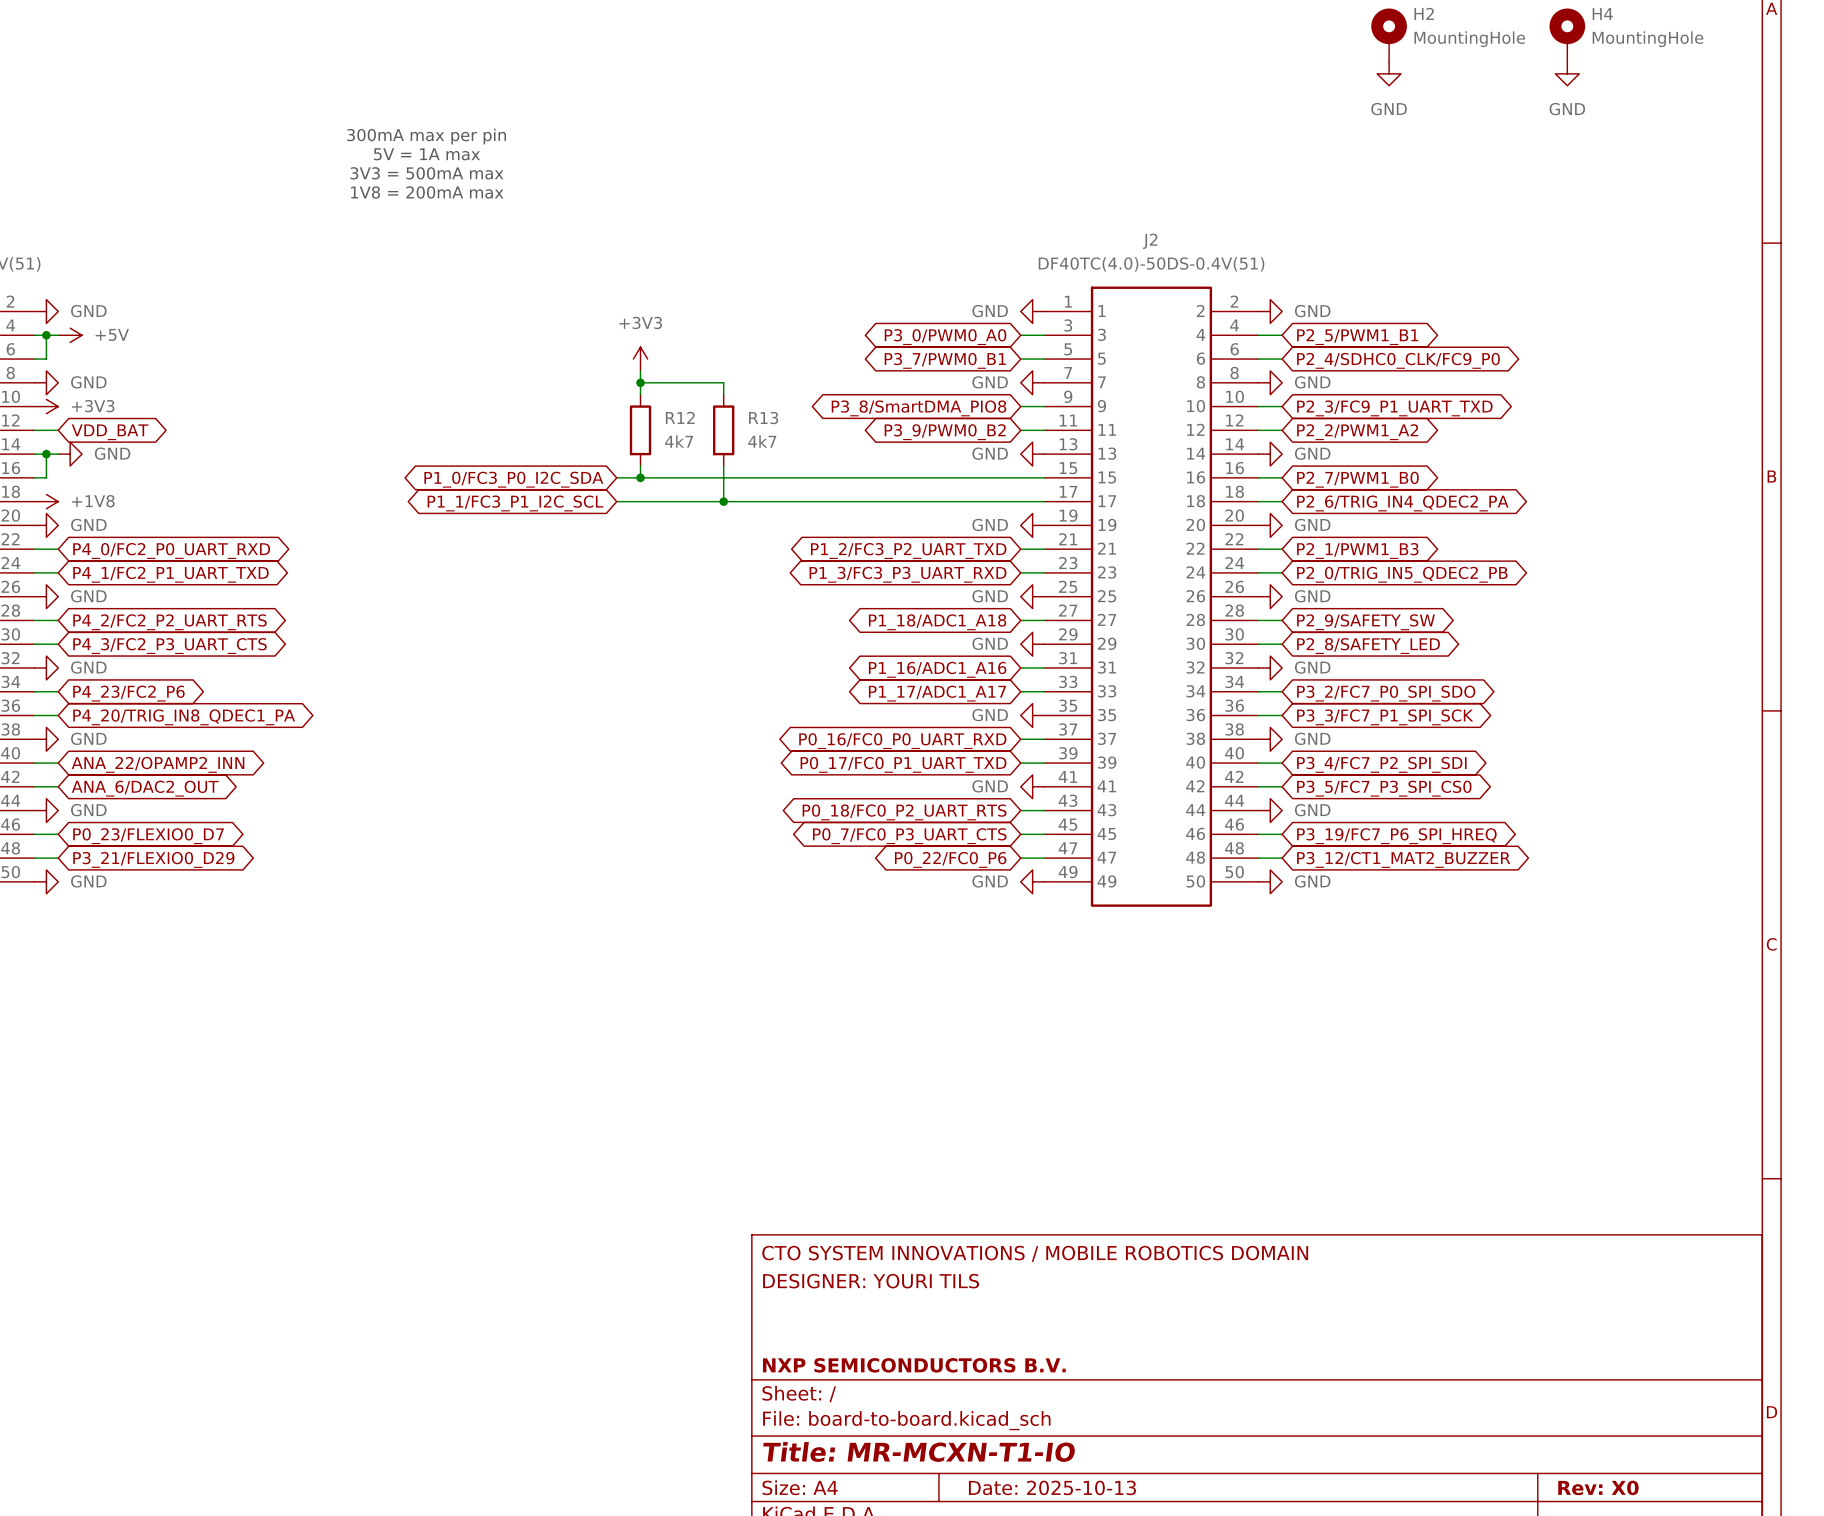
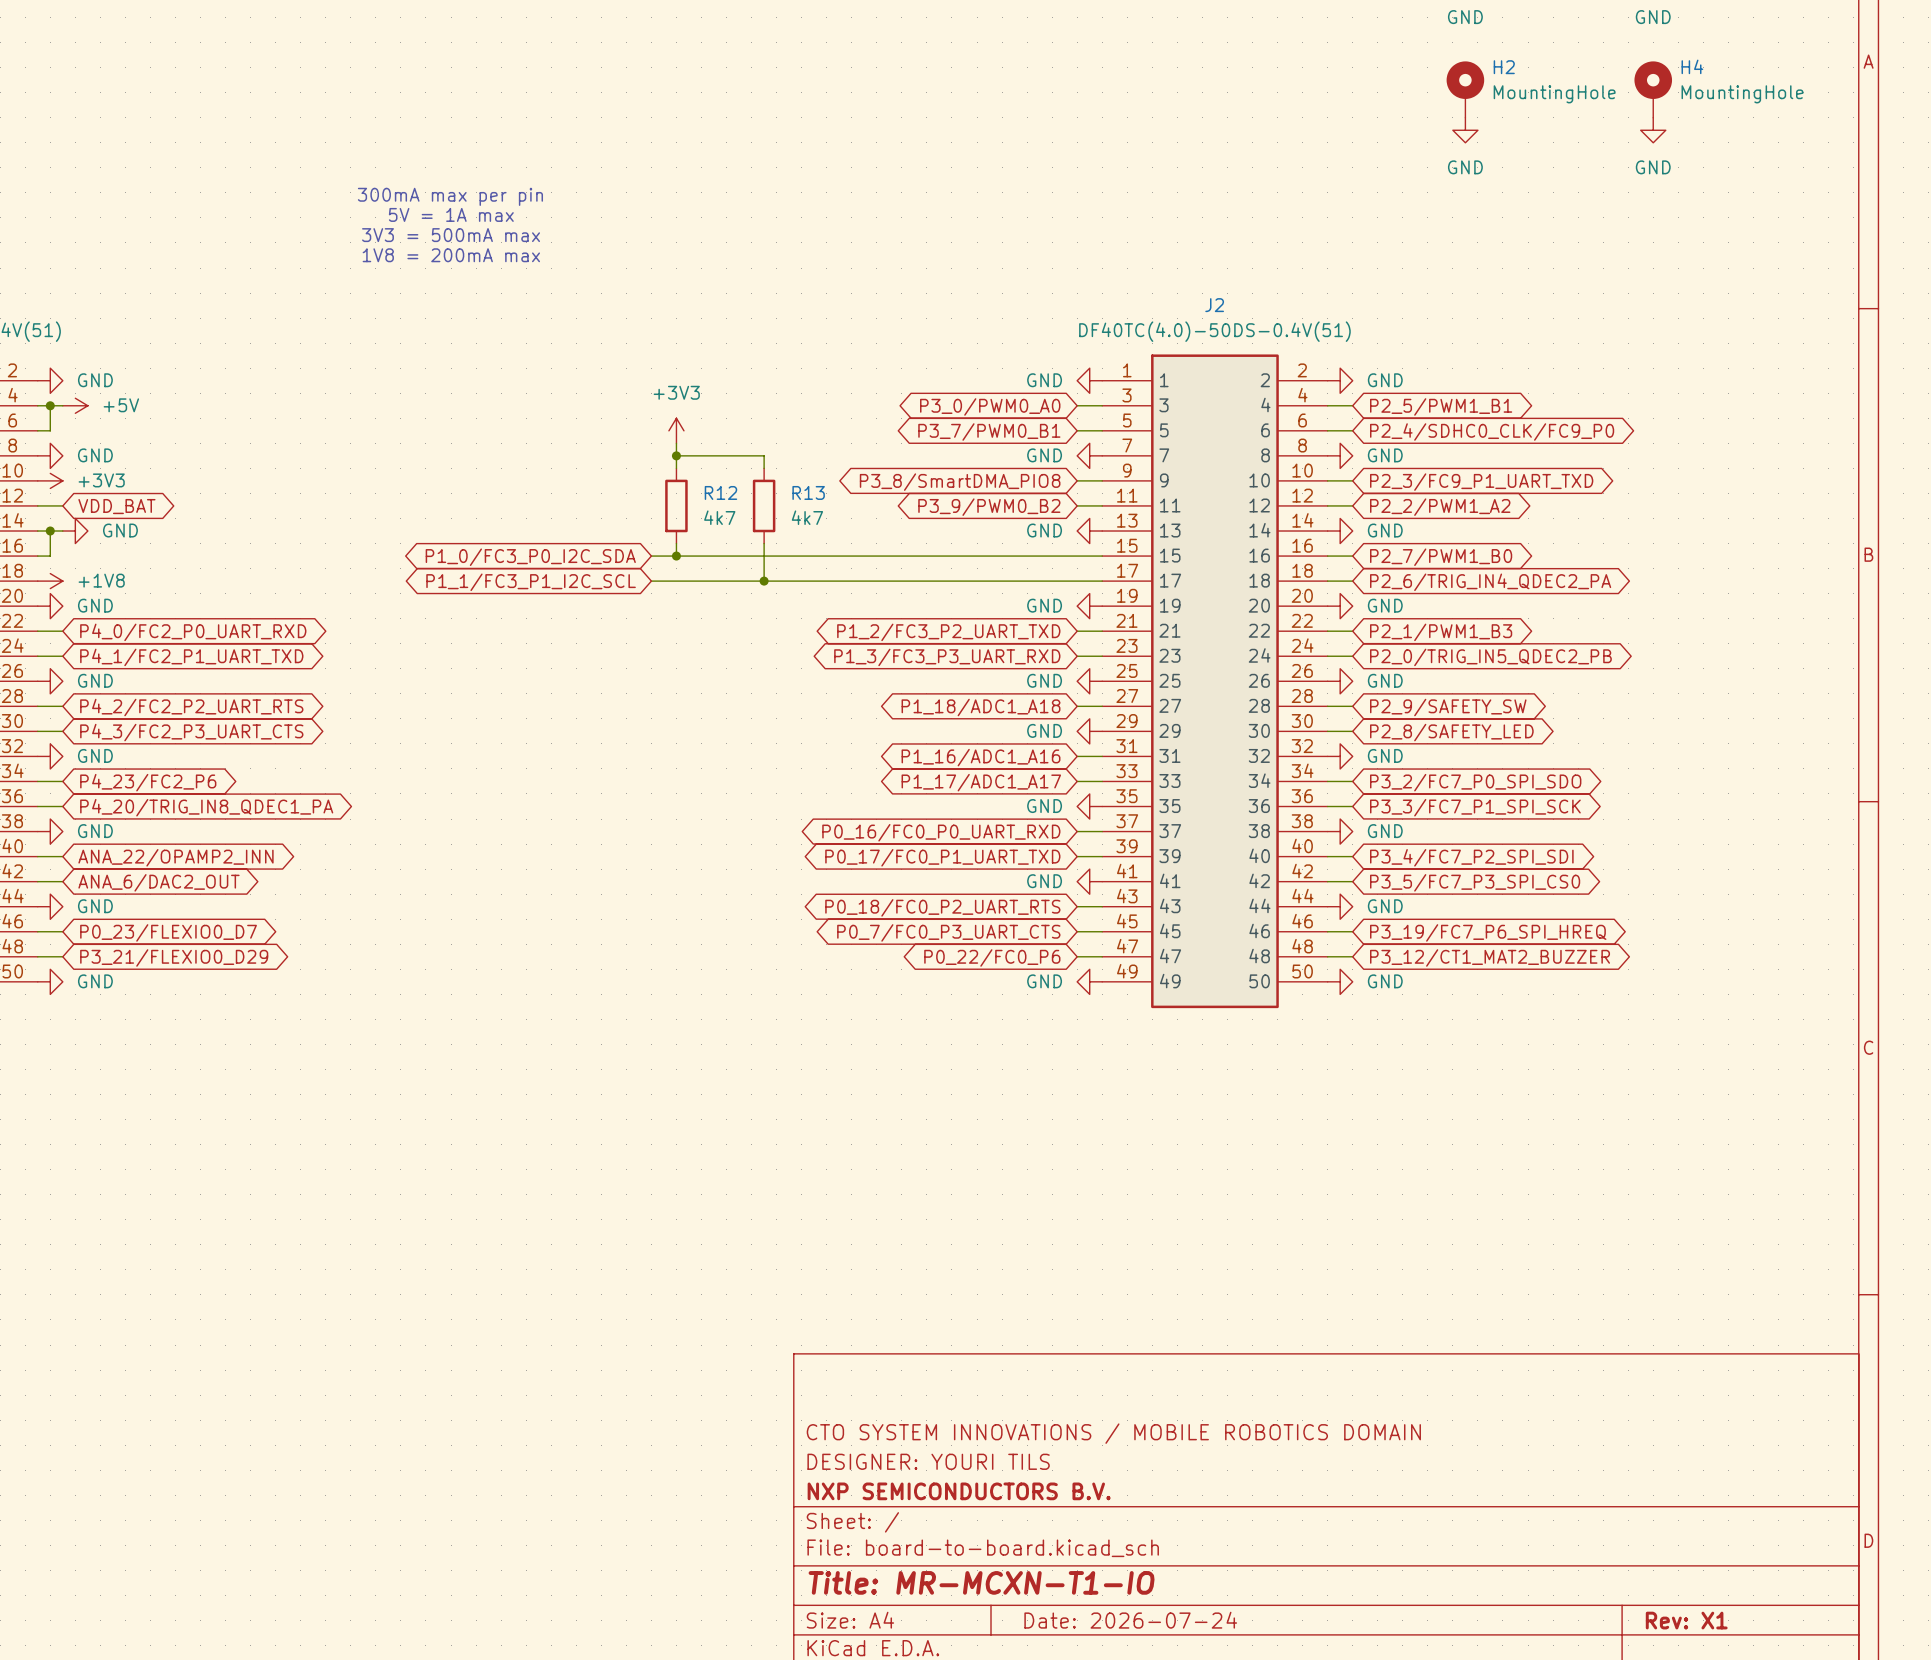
title block position: CTO SYSTEM INNOVATIONS / MOBILE ROBOTICS DOMAIN (1035, 1253) -> CTO SYSTEM INNOVATIONS / MOBILE ROBOTICS DOMAIN (1113, 1433)
title block position: DESIGNER: YOURI TILS (871, 1281) -> DESIGNER: YOURI TILS (928, 1461)
title block: Date: 2025-10-13 (1052, 1487) -> Date: 2026-07-24 (1130, 1620)
title block: Rev: X0 (1598, 1487) -> Rev: X1 (1686, 1620)

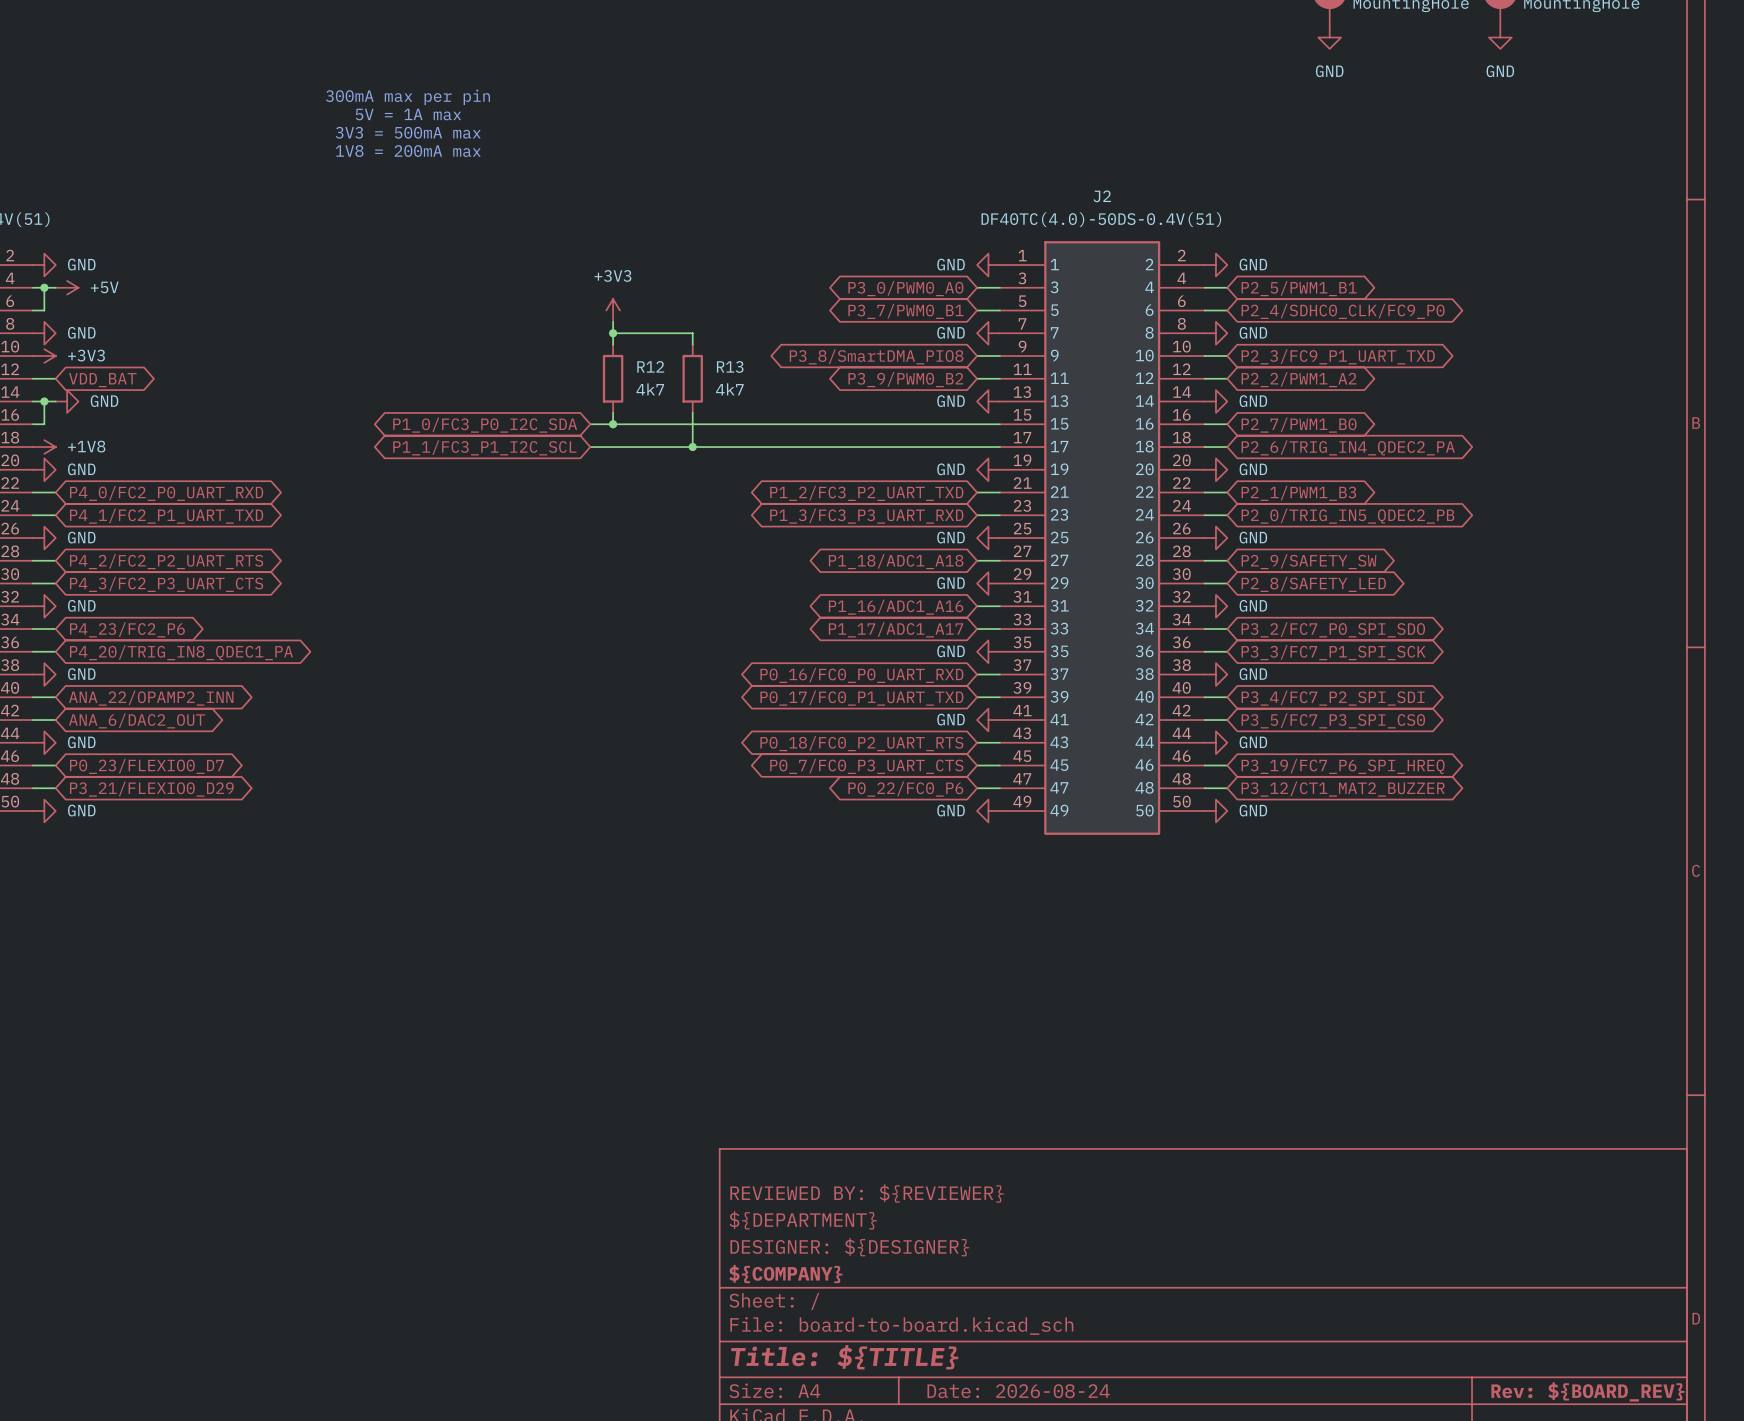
title block: none -> REVIEWED BY: ${REVIEWER} (867, 1193)
title block: CTO SYSTEM INNOVATIONS / MOBILE ROBOTICS DOMAIN (1113, 1433) -> ${DEPARTMENT} (803, 1220)
title block: DESIGNER: YOURI TILS (928, 1461) -> DESIGNER: ${DESIGNER} (849, 1247)
title block: NXP SEMICONDUCTORS B.V. (959, 1491) -> ${COMPANY} (785, 1274)
title block: Title: MR-MCXN-T1-IO (981, 1582) -> Title: ${TITLE} (844, 1357)
title block: Date: 2026-07-24 (1130, 1620) -> Date: 2026-08-24 (1018, 1391)
title block: Rev: X1 (1686, 1620) -> Rev: ${BOARD_REV} (1587, 1391)

